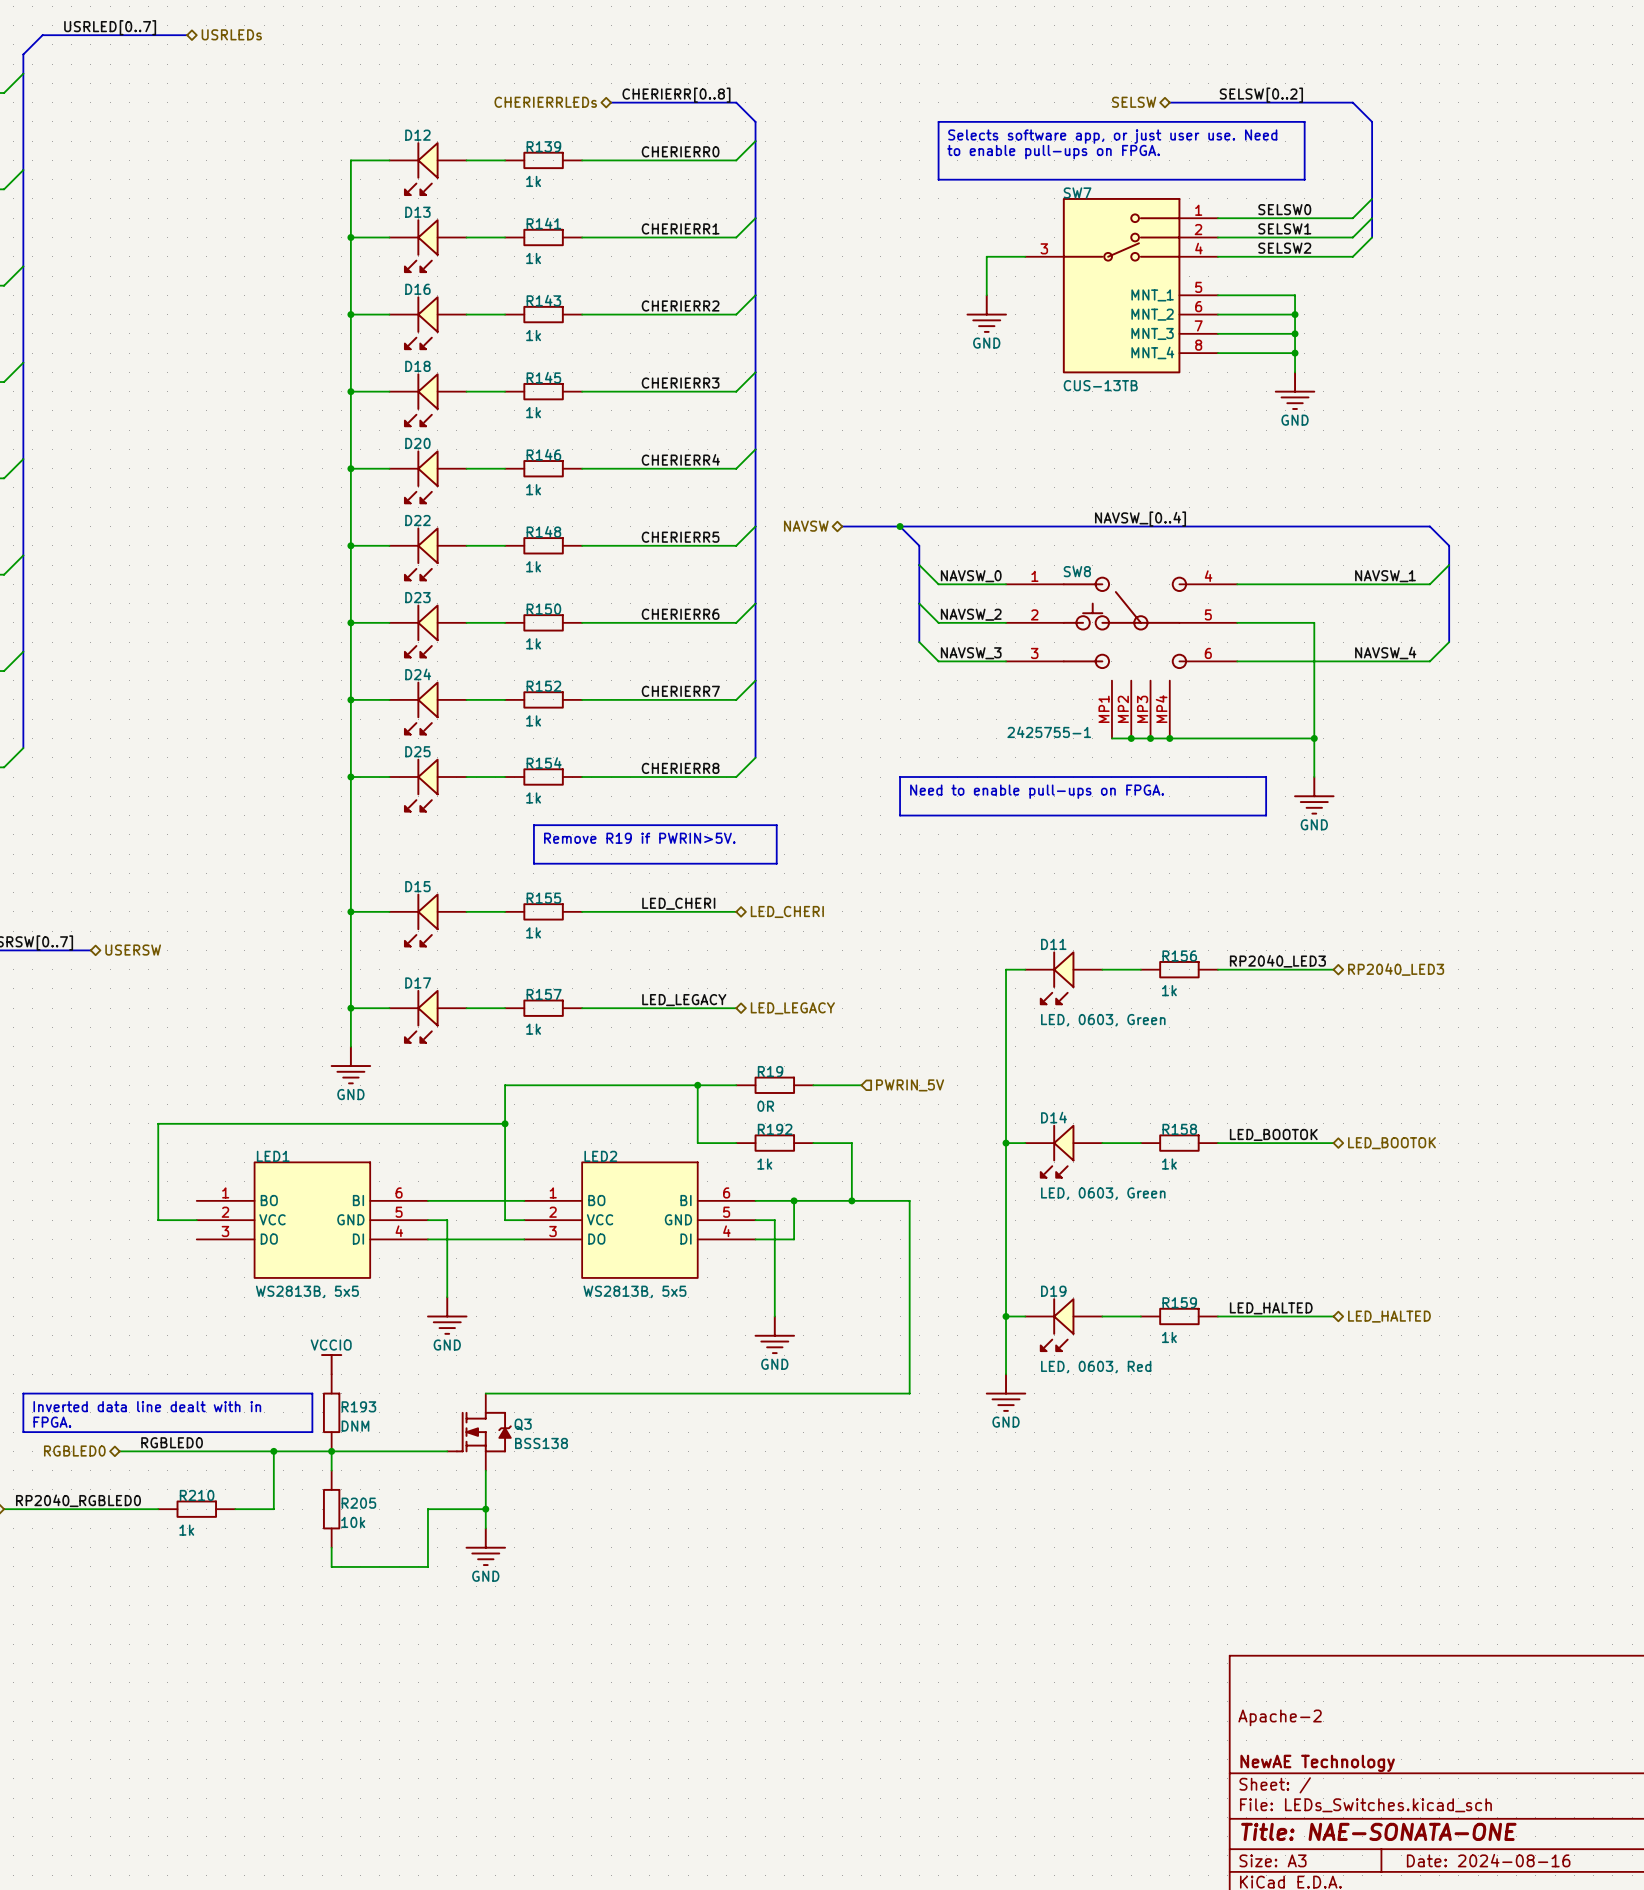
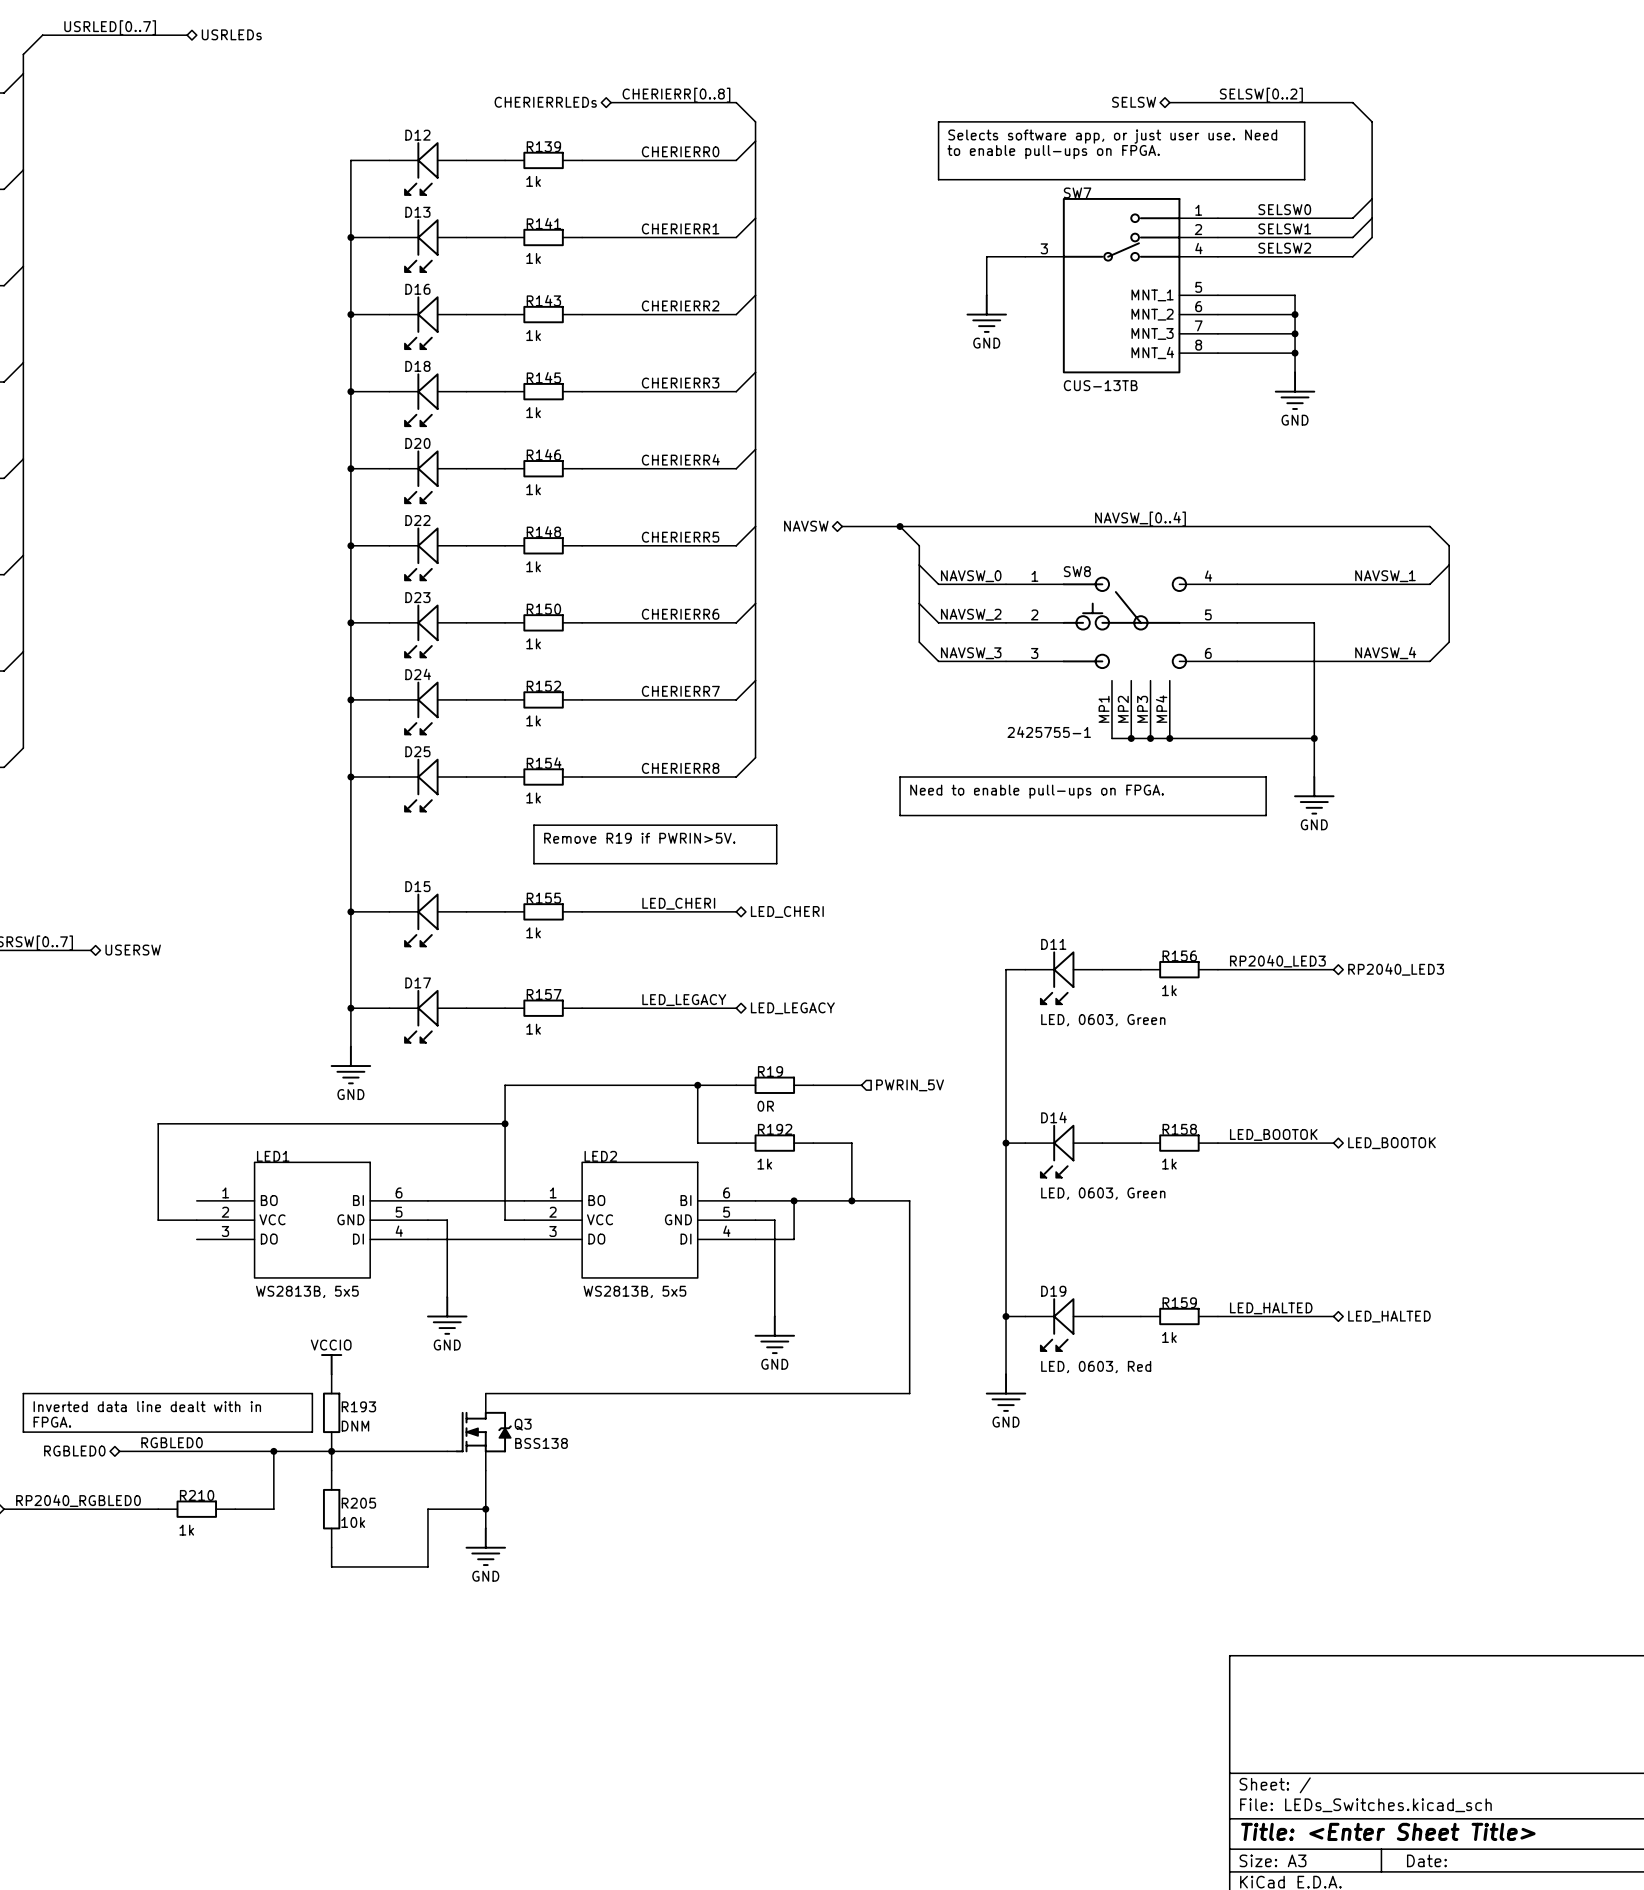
title block: Apache-2 (1280, 1717) -> none
title block: NewAE Technology (1317, 1763) -> none
title block: Title: NAE-SONATA-ONE (1378, 1831) -> Title: <Enter Sheet Title> (1388, 1831)
title block: Date: 2024-08-16 (1488, 1860) -> Date: (1426, 1860)

